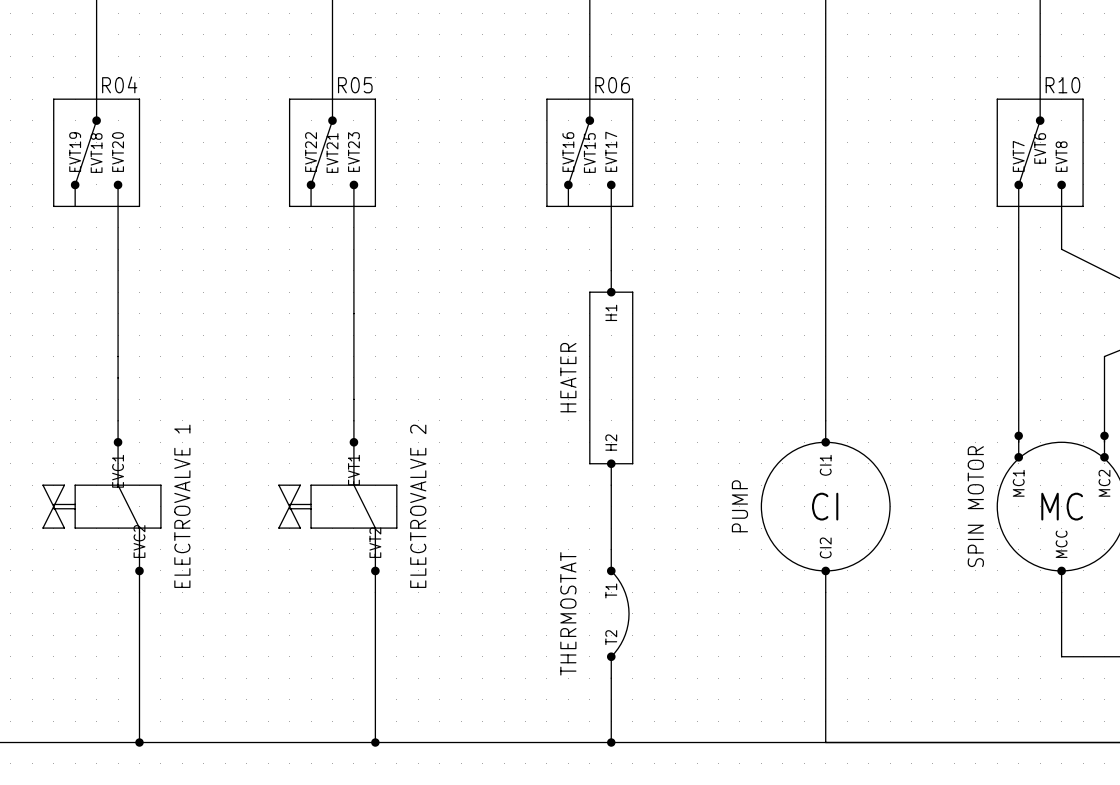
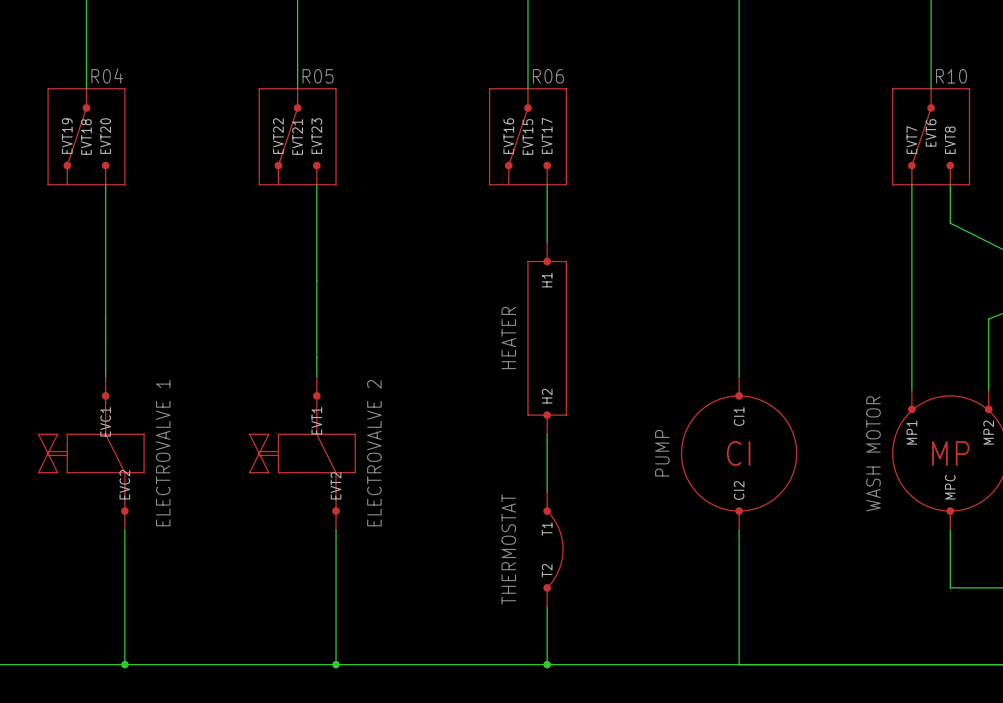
junction: (1018, 435) -> none
junction: (1104, 435) -> none
MC1 name: MC1 (1018, 483) -> MP1 (911, 432)
MC2 name: MC2 (1104, 483) -> MP2 (988, 432)
text: SPIN MOTOR (975, 506) -> WASH MOTOR (873, 453)
text: MC (1062, 506) -> MP (950, 453)
MCC name: MCC (1061, 544) -> MPC (950, 487)

